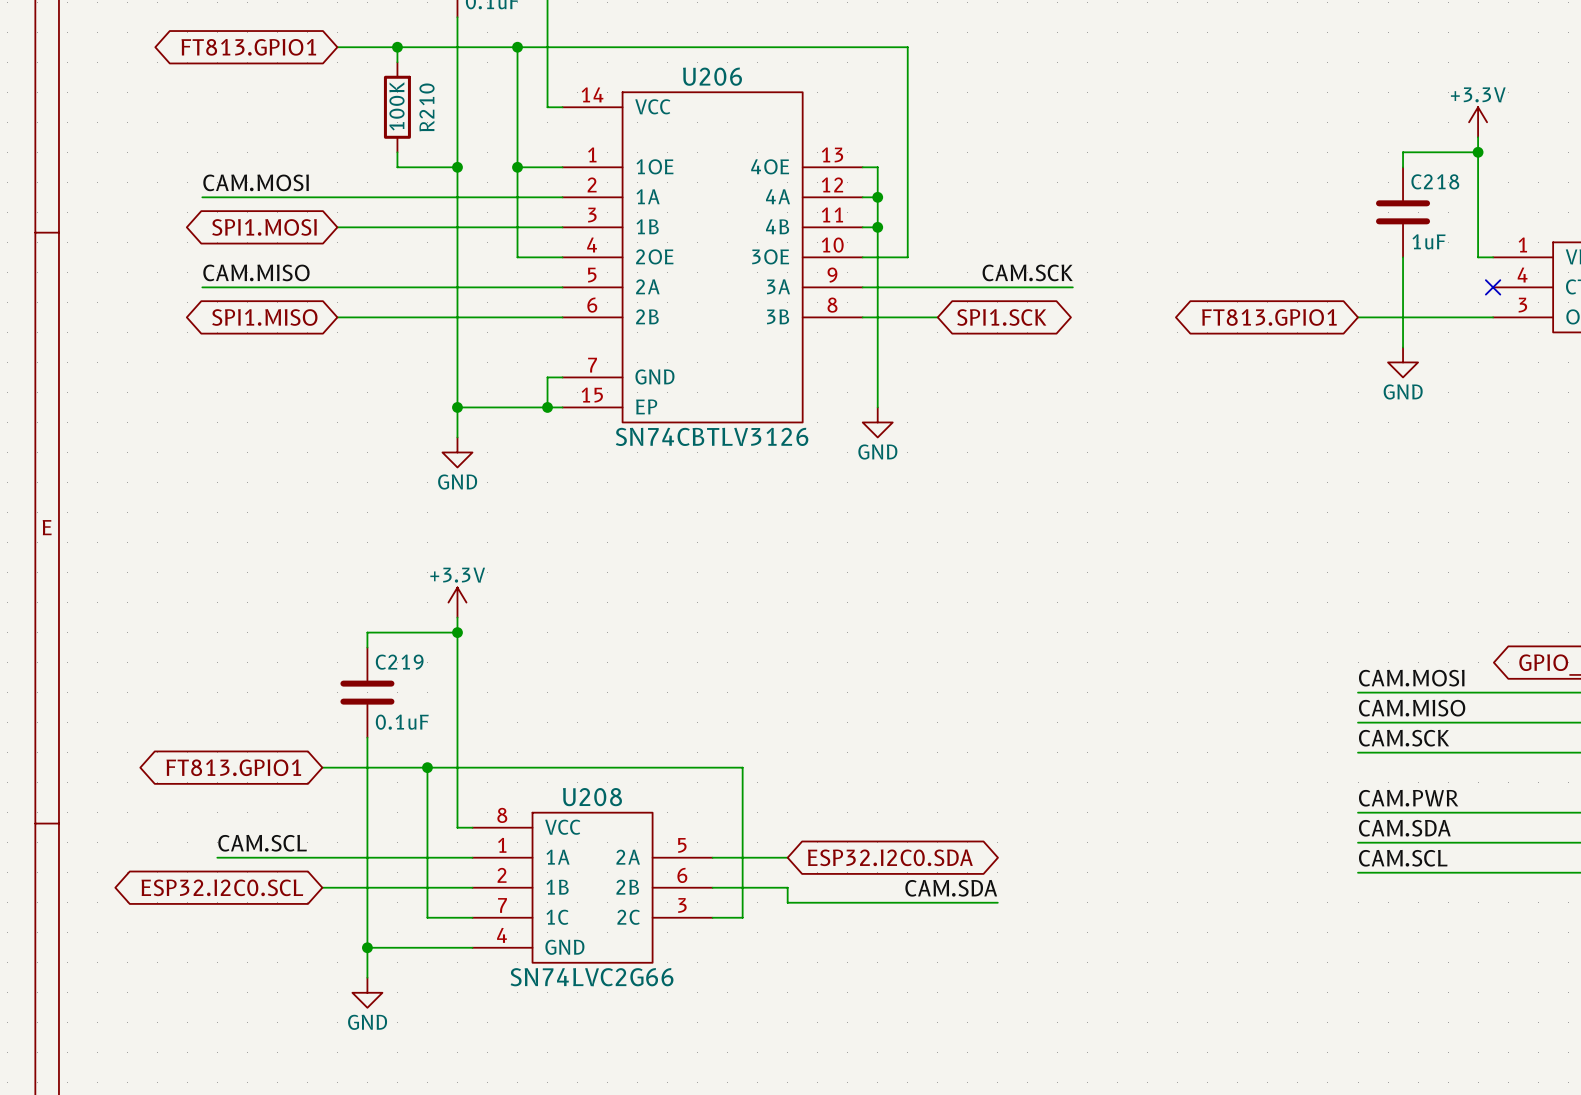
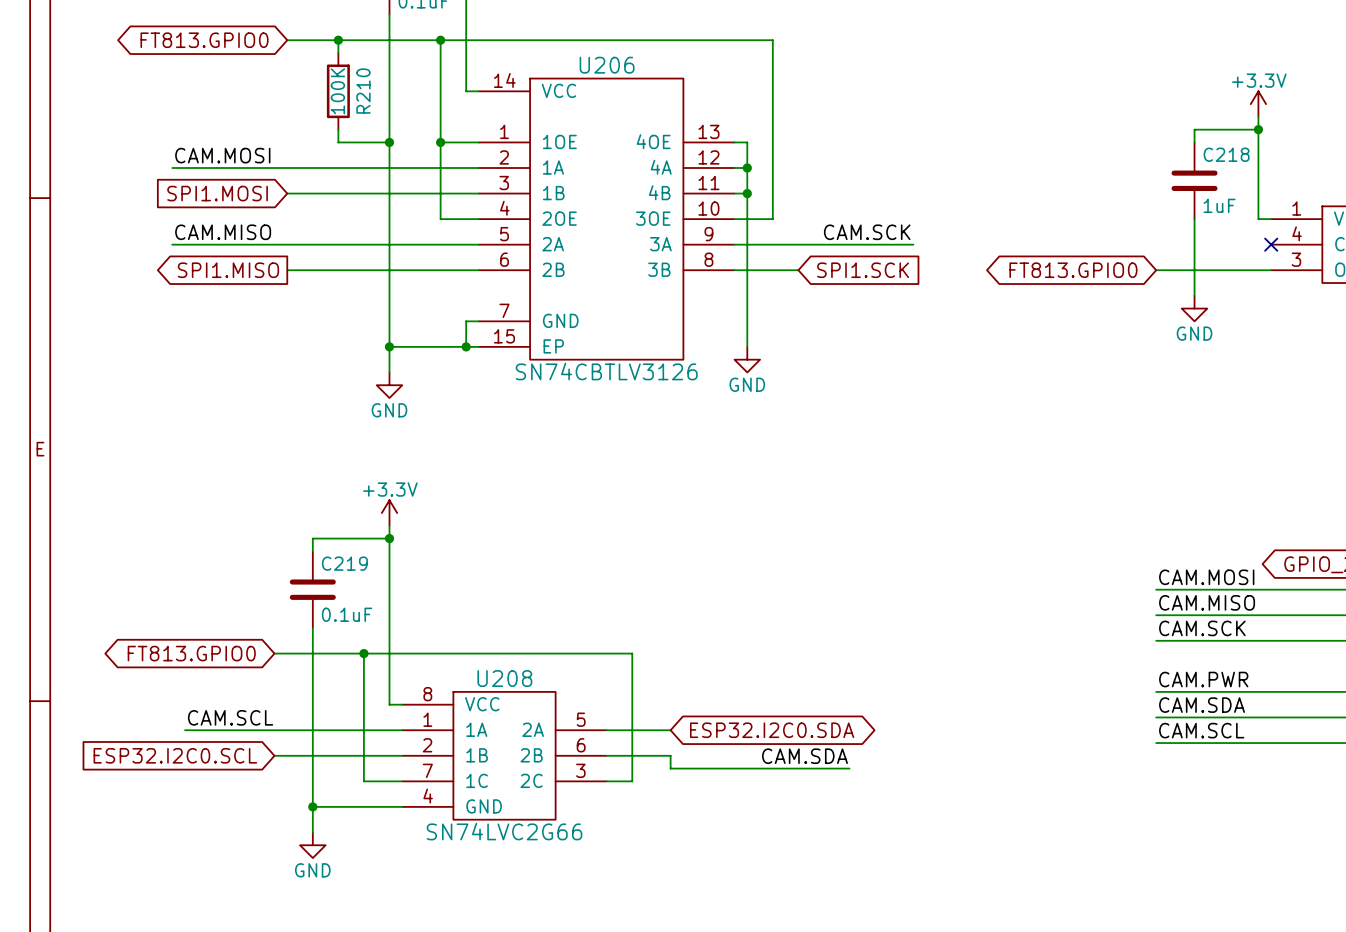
global label: FT813.GPIO1 (248, 47) -> FT813.GPIO0 (204, 40)
global label shape: bidirectional (264, 227) -> input (217, 193)
global label shape: bidirectional (264, 317) -> output (228, 270)
global label shape: bidirectional (1001, 317) -> input (863, 270)
global label: FT813.GPIO1 (1269, 317) -> FT813.GPIO0 (1073, 270)
global label: FT813.GPIO1 (233, 767) -> FT813.GPIO0 (191, 653)
global label shape: bidirectional (222, 887) -> input (175, 755)

